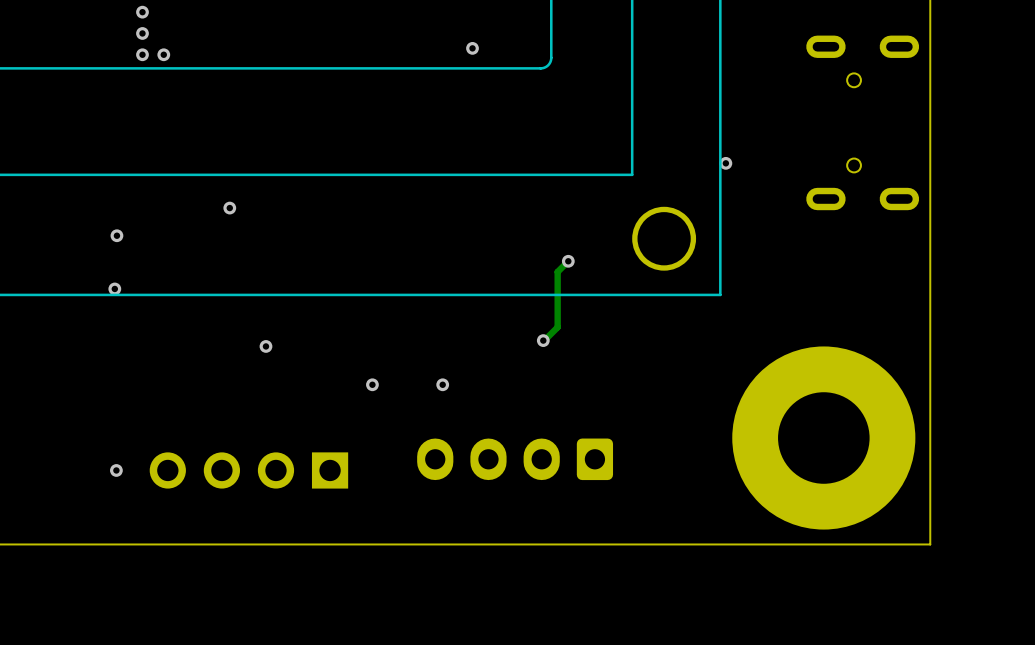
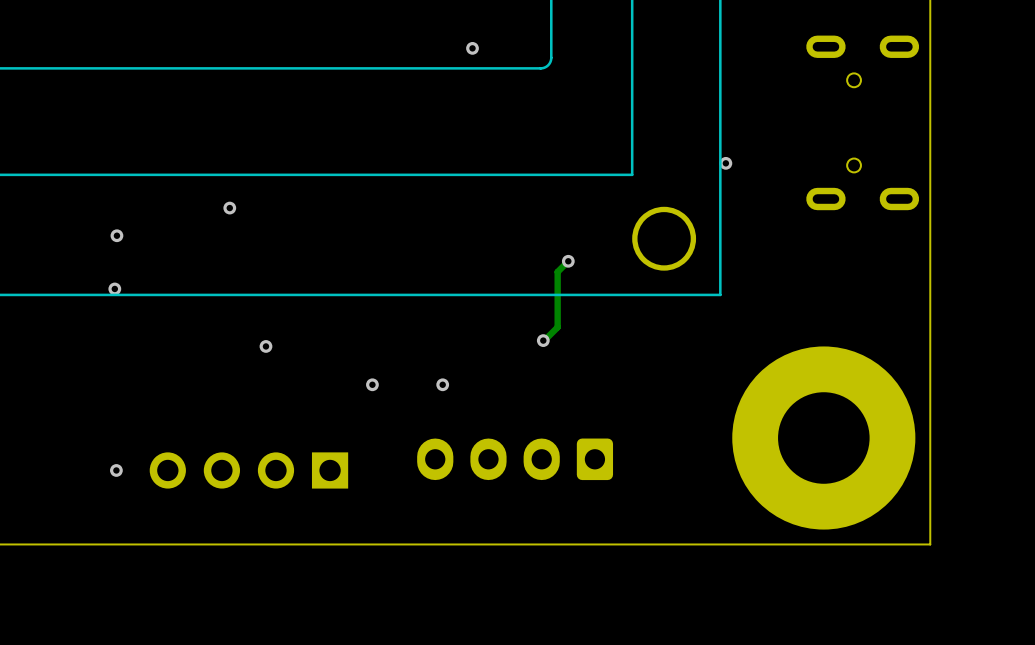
via: (142, 12) -> none
via: (142, 33) -> none
via: (142, 54) -> none
via: (163, 54) -> none

